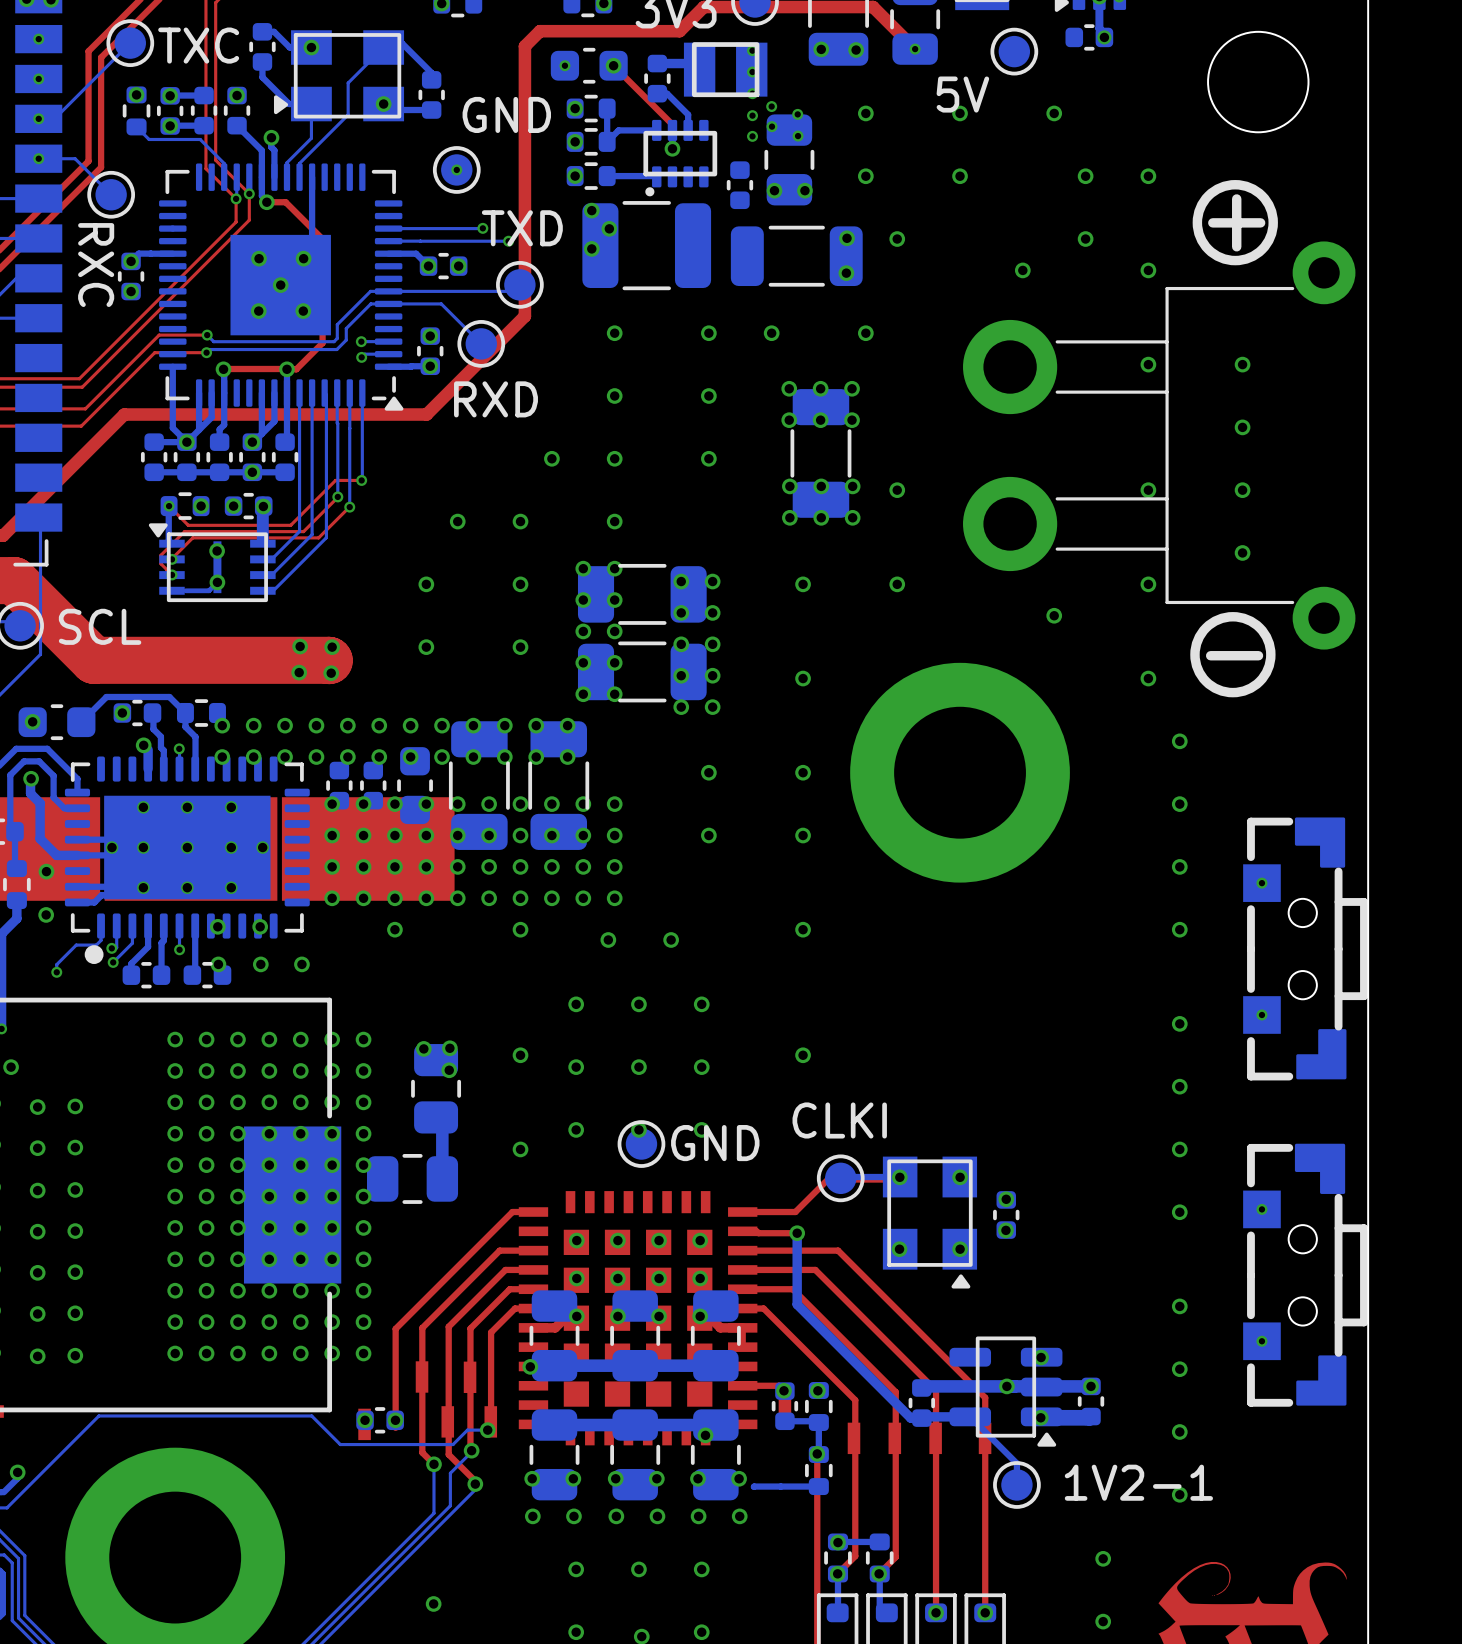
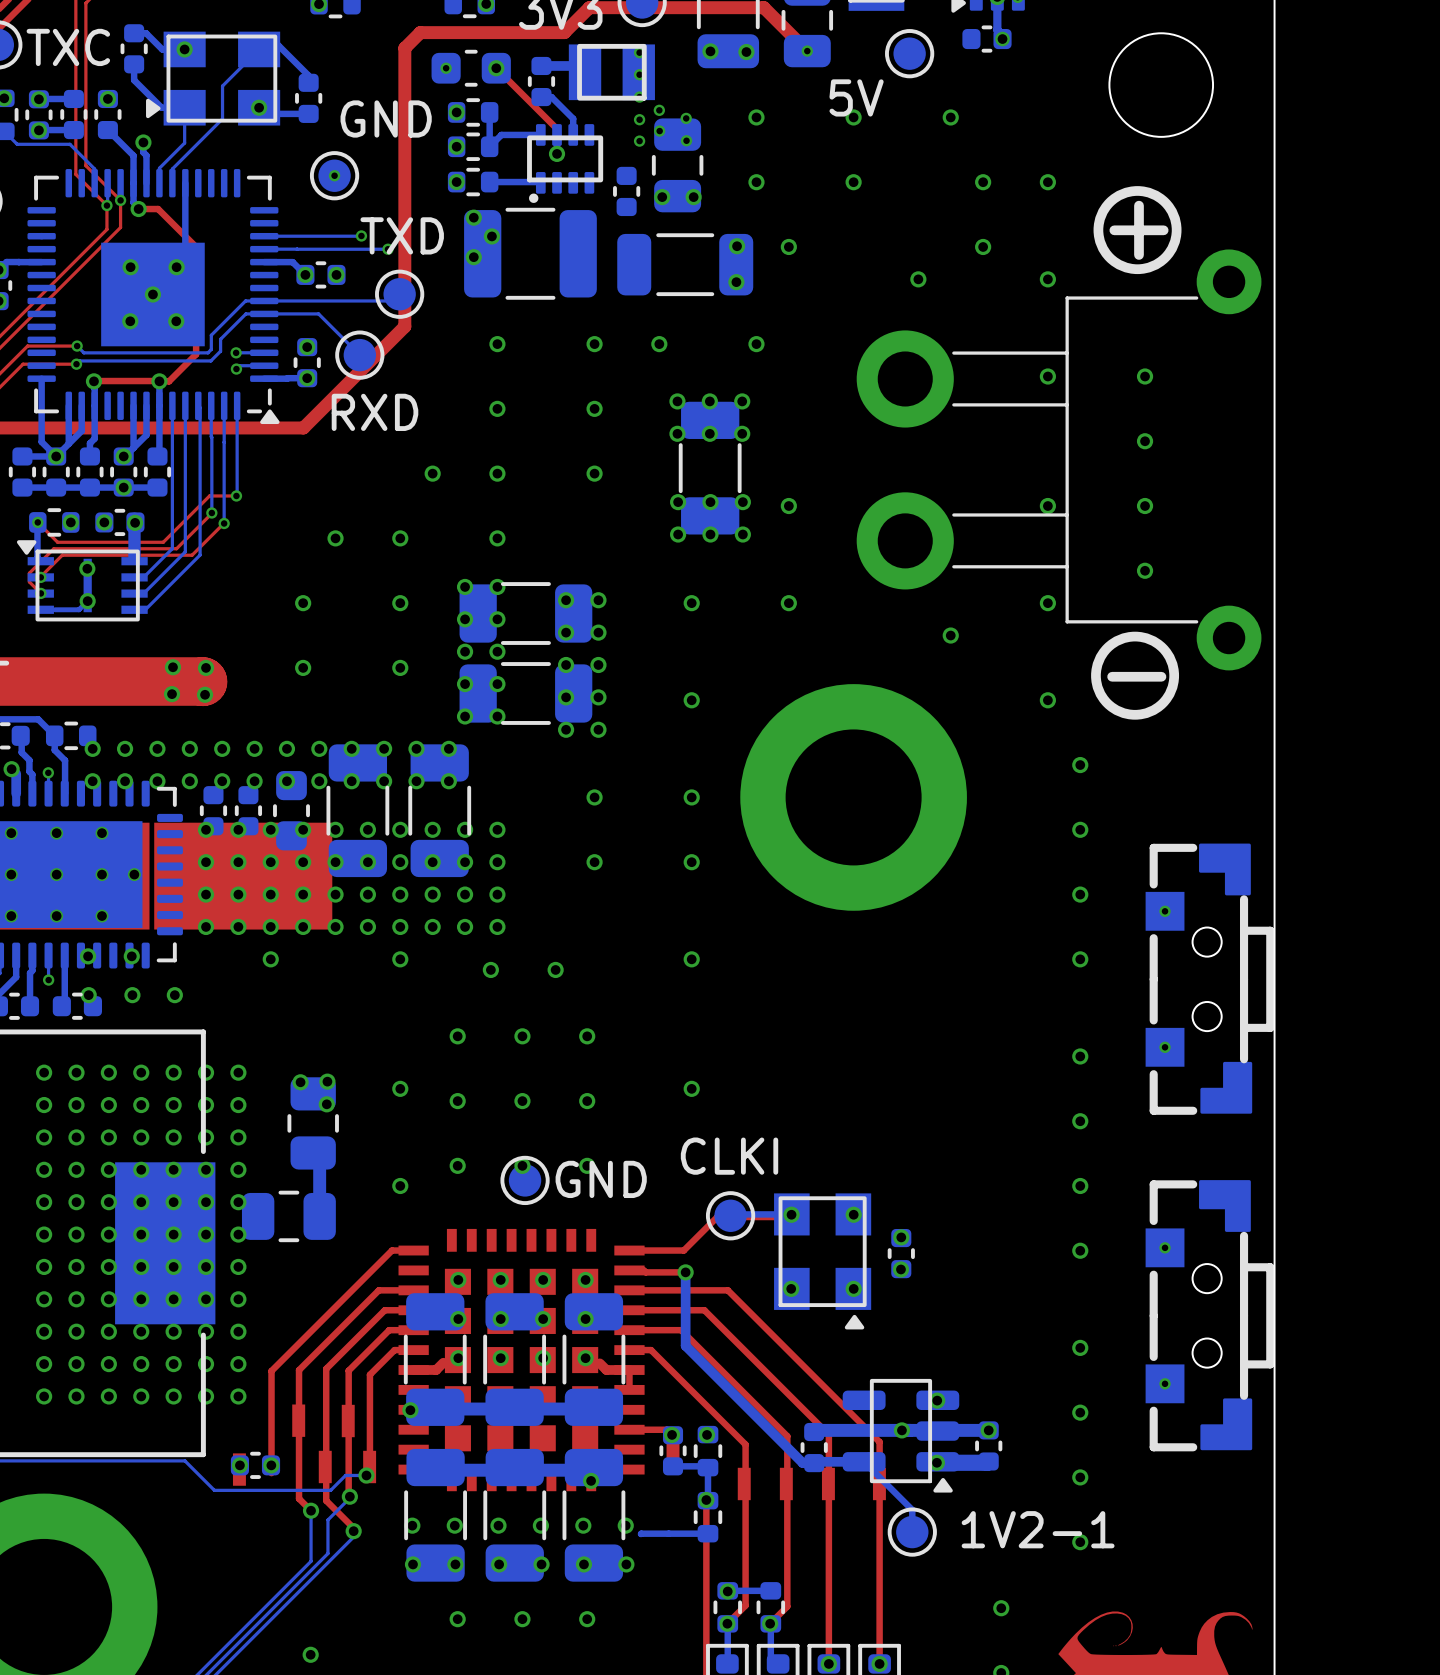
part footprint: [529, 1290, 580, 1382] -> [403, 1293, 467, 1426]
part footprint: [610, 1290, 661, 1382] -> [483, 1293, 547, 1426]
part footprint: [690, 1290, 741, 1382] -> [562, 1293, 626, 1426]
part footprint: [529, 1409, 580, 1501] -> [404, 1448, 468, 1582]
part footprint: [610, 1409, 661, 1501] -> [483, 1448, 547, 1582]
part footprint: [690, 1409, 741, 1501] -> [562, 1448, 626, 1582]

